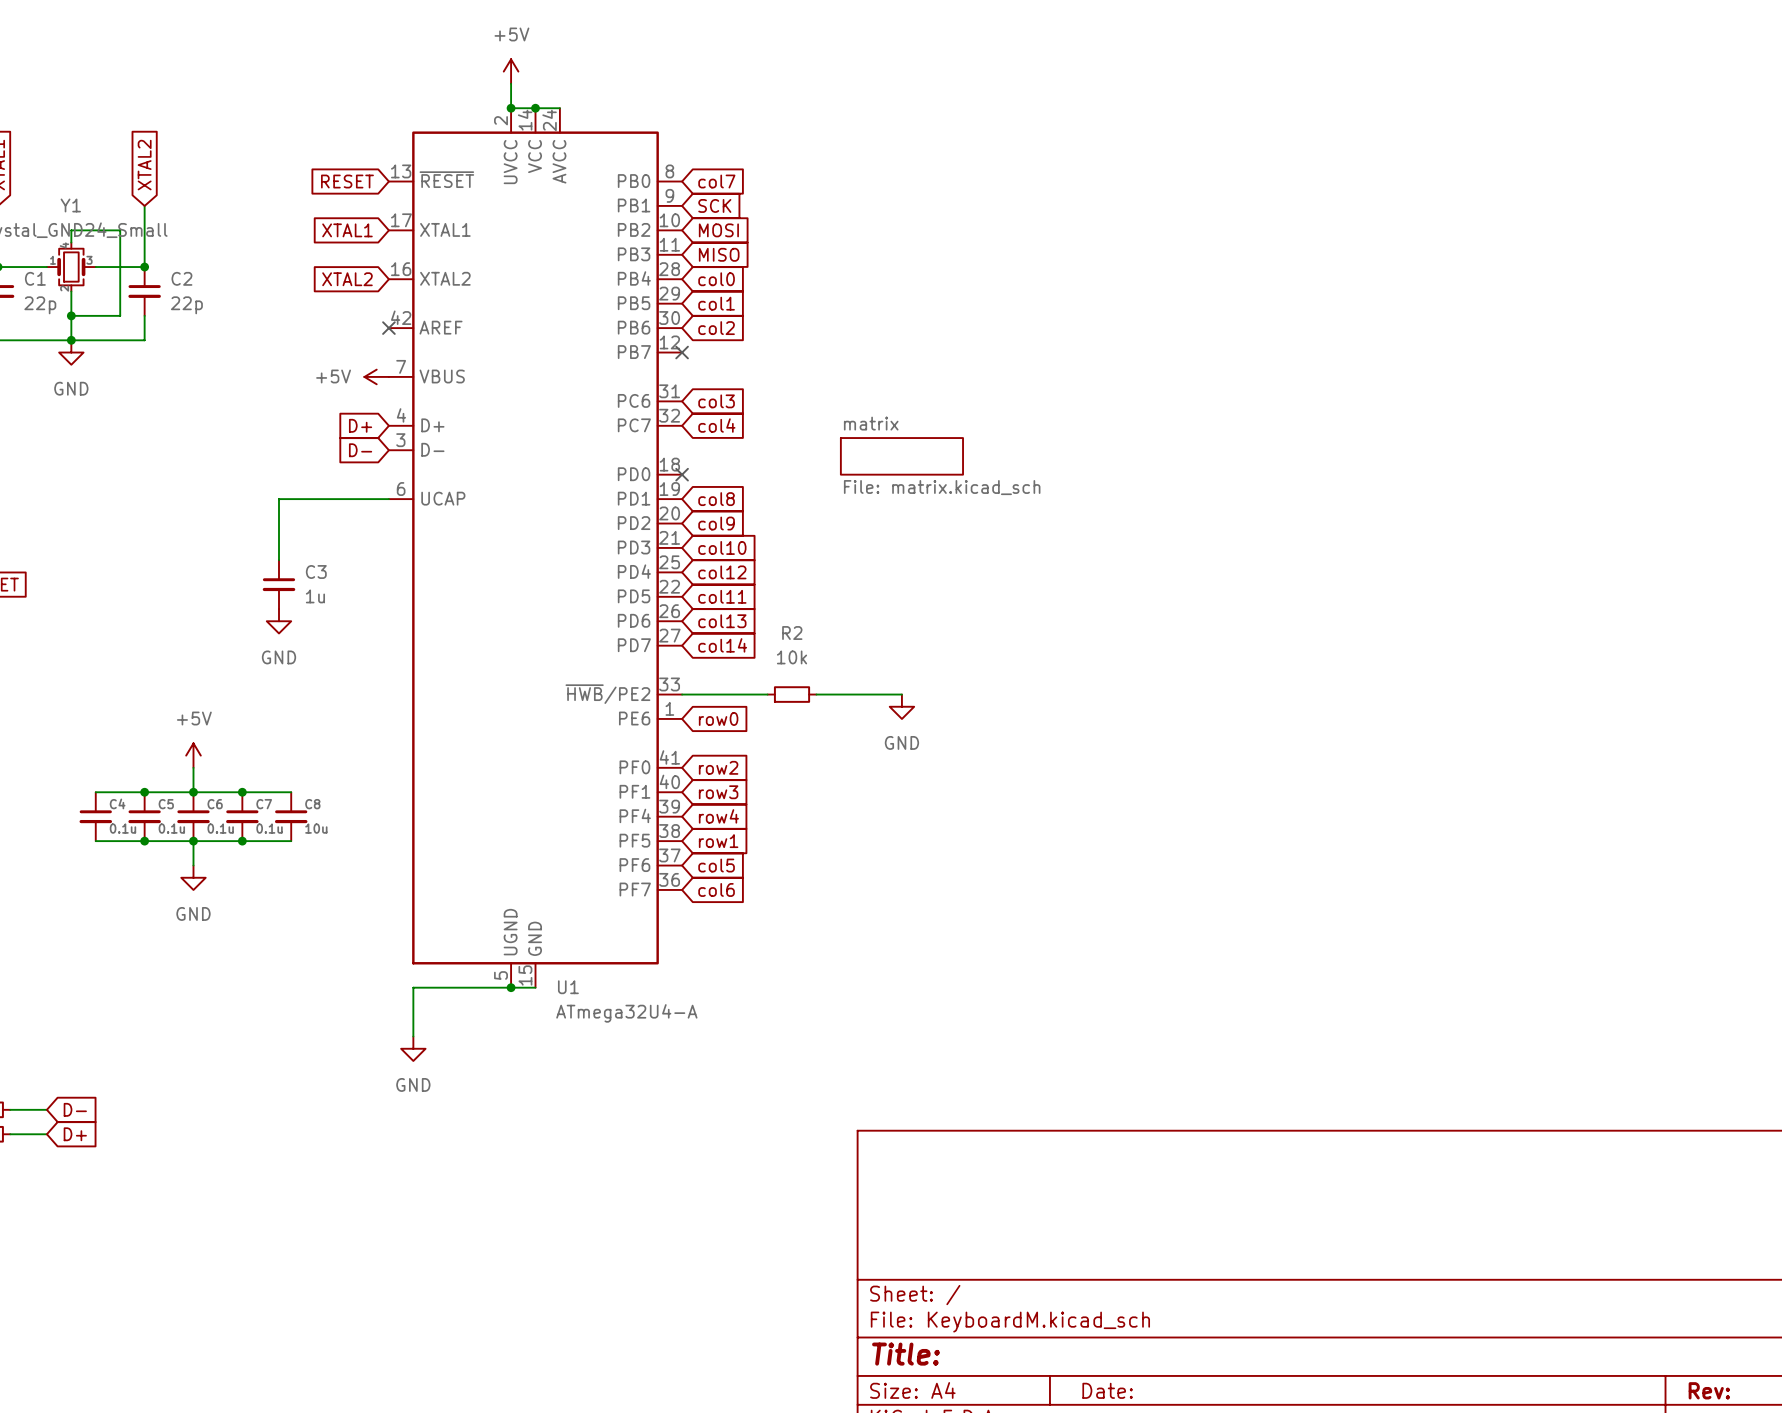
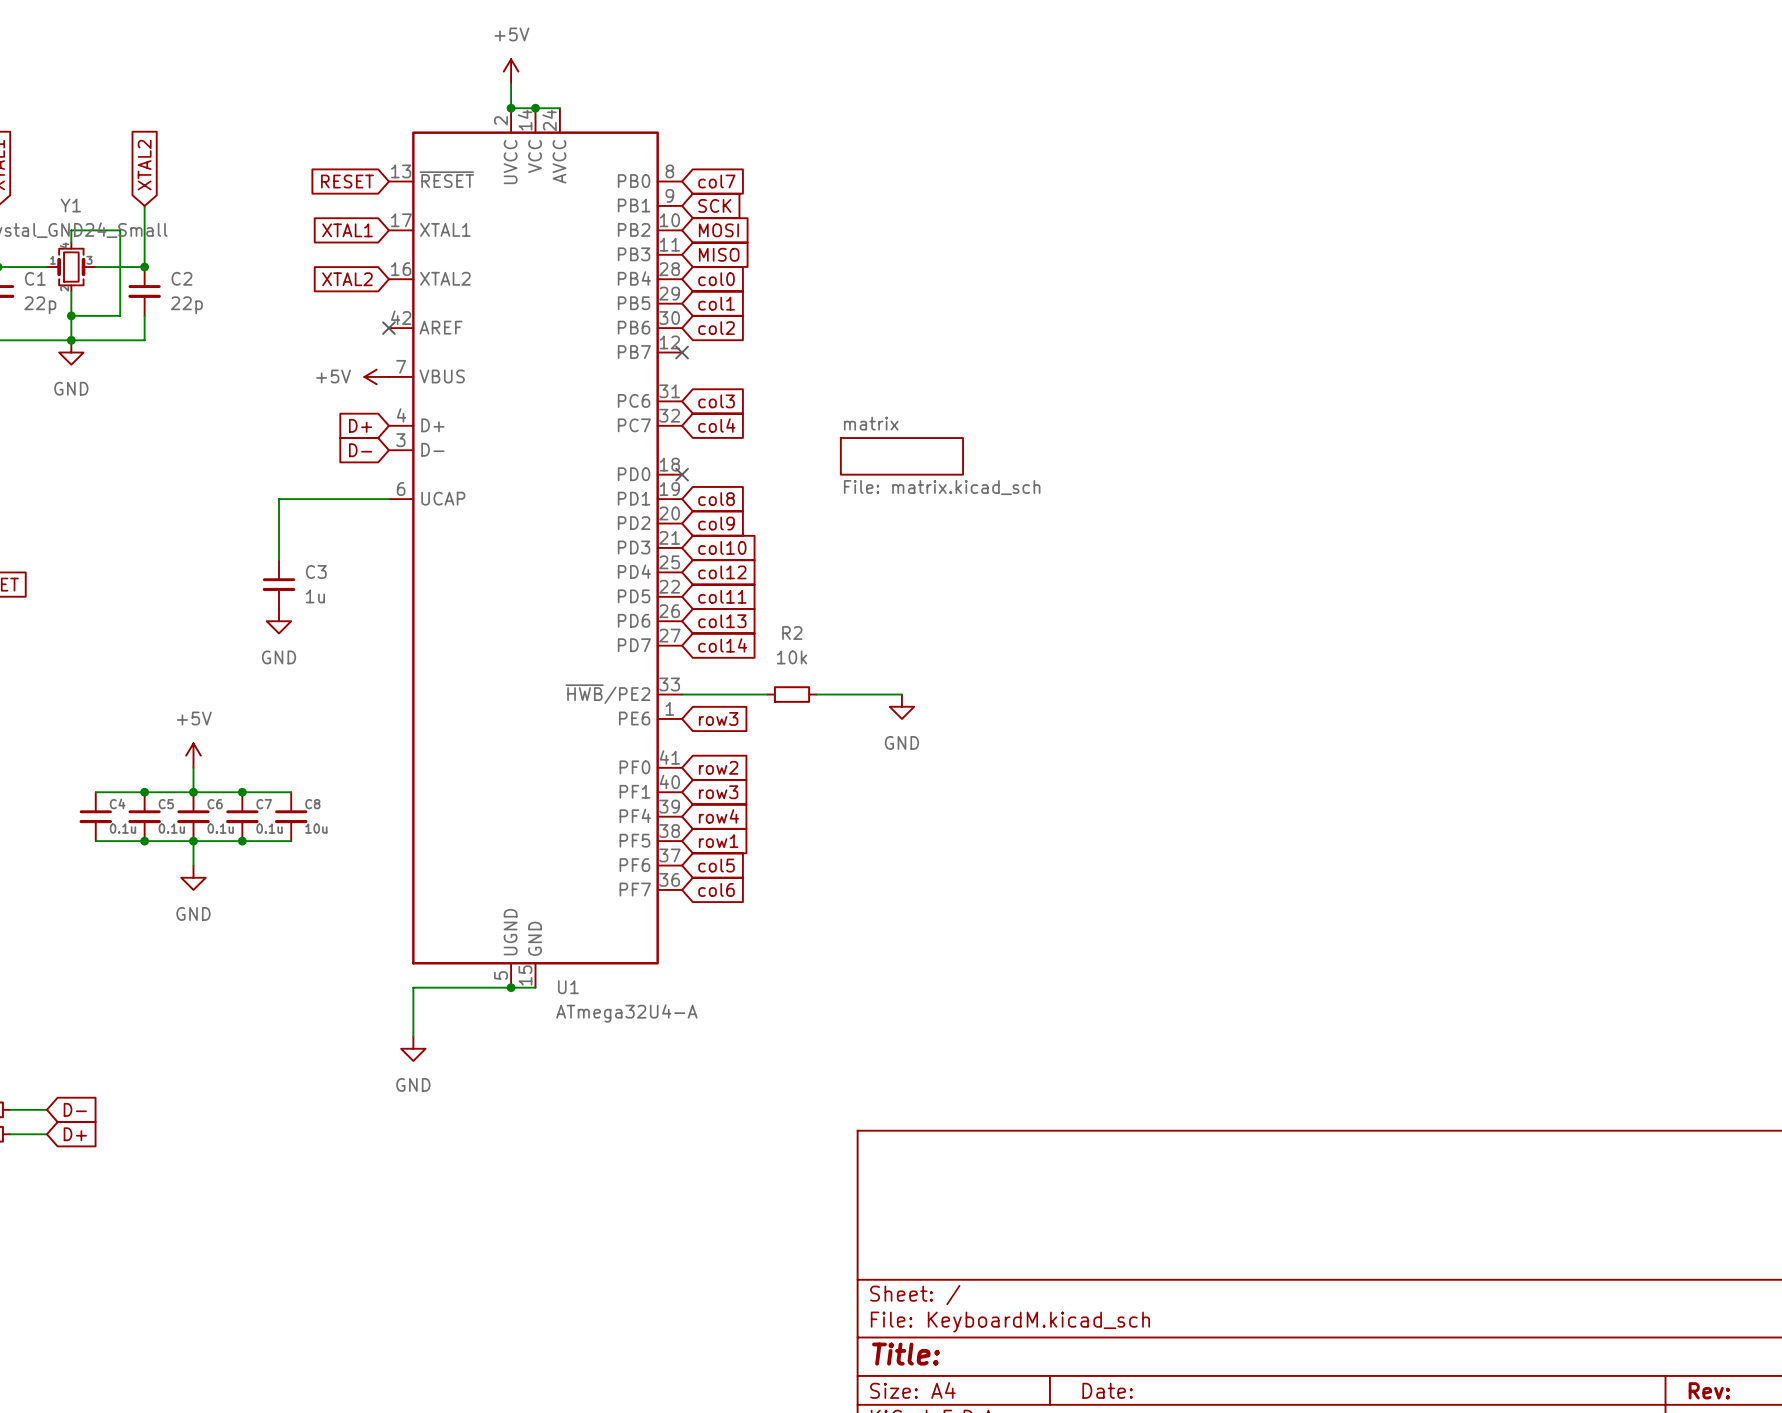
global label: row0 (718, 718) -> row3 (718, 718)

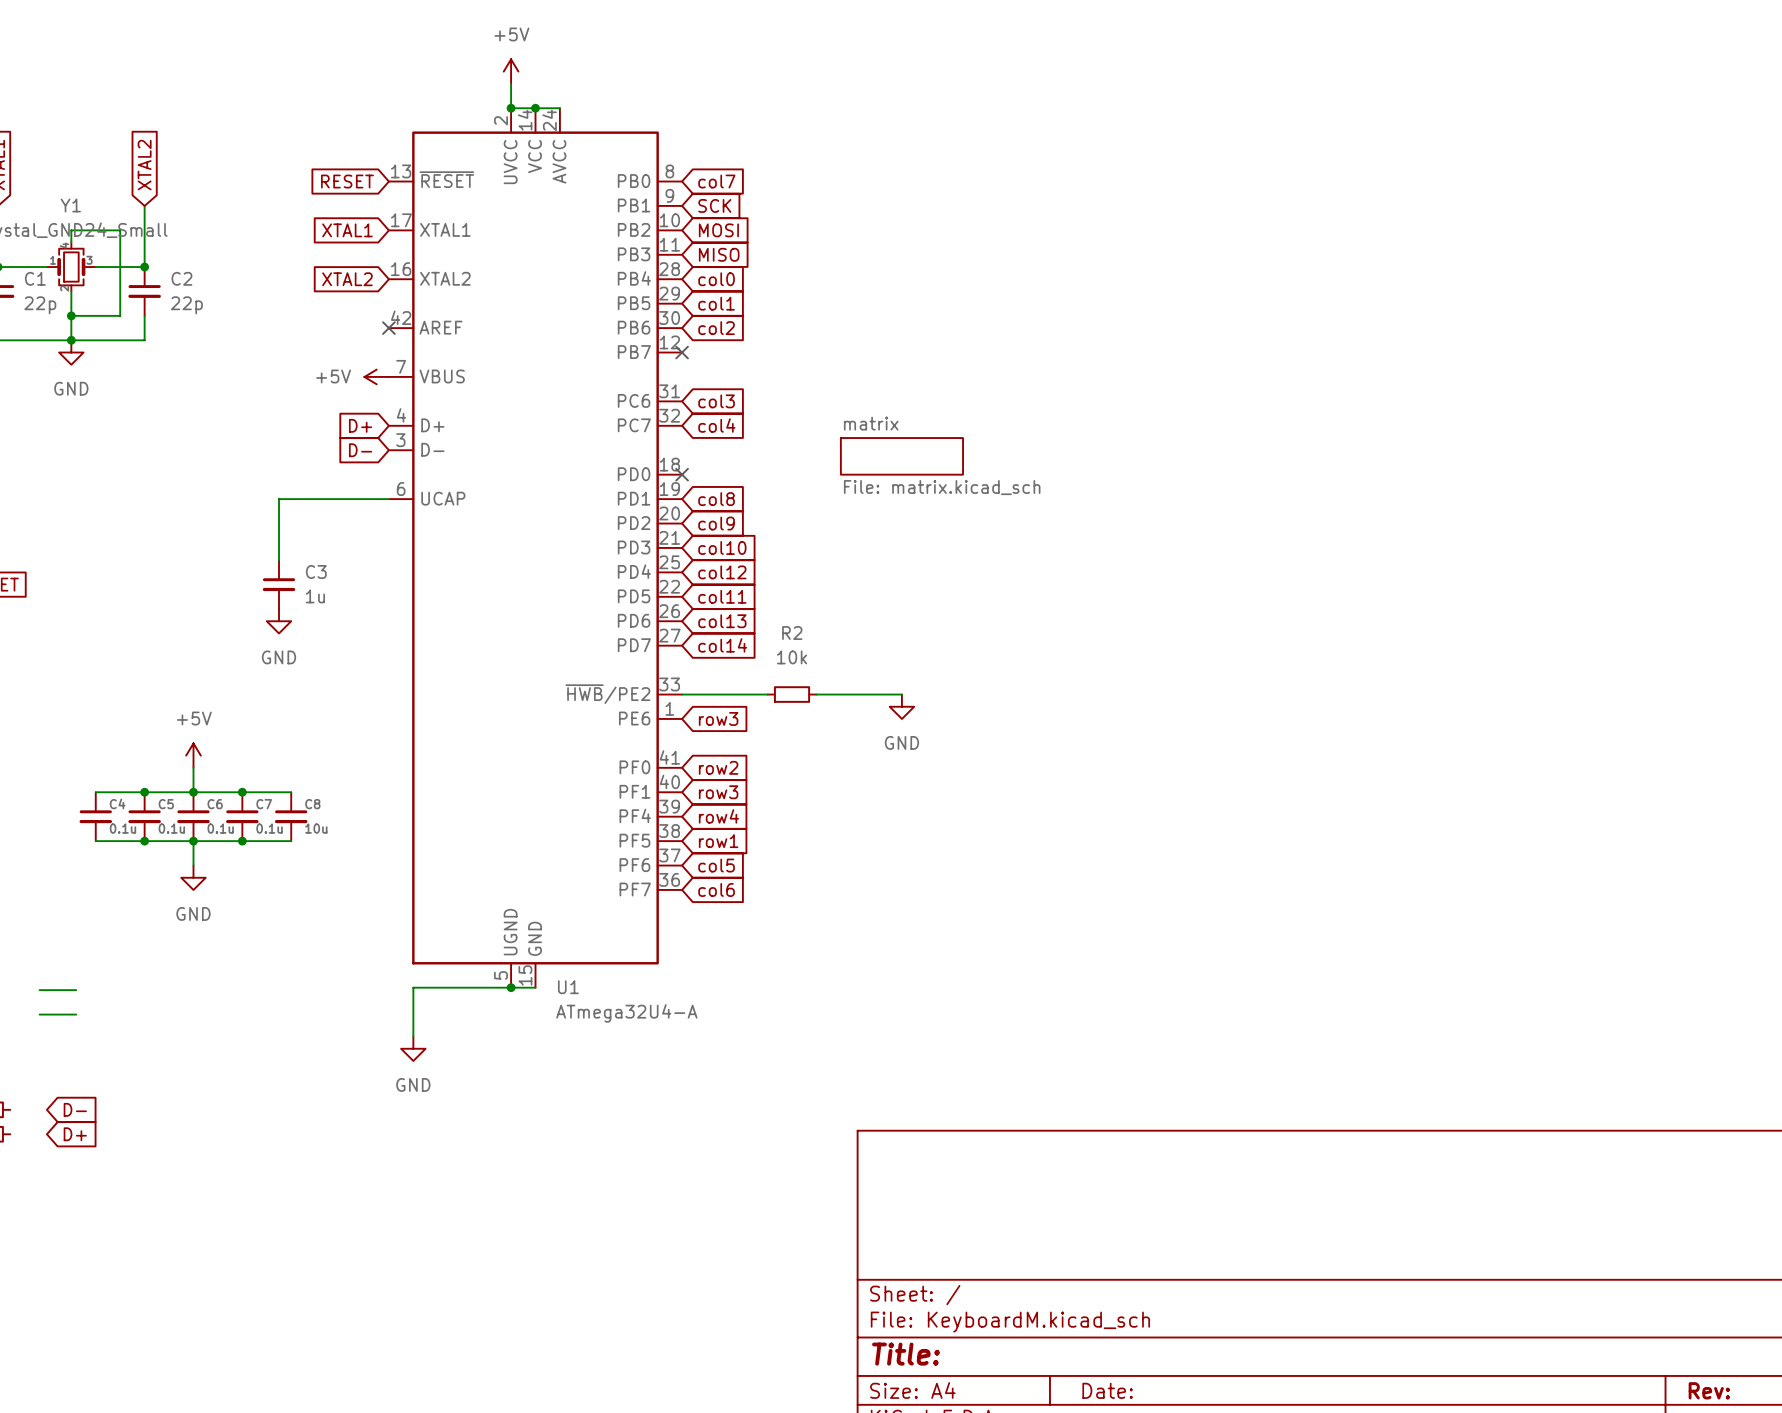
wire: (10, 1109) (46, 1109) -> (39, 990) (76, 990)
wire: (10, 1134) (46, 1134) -> (39, 1014) (76, 1014)

